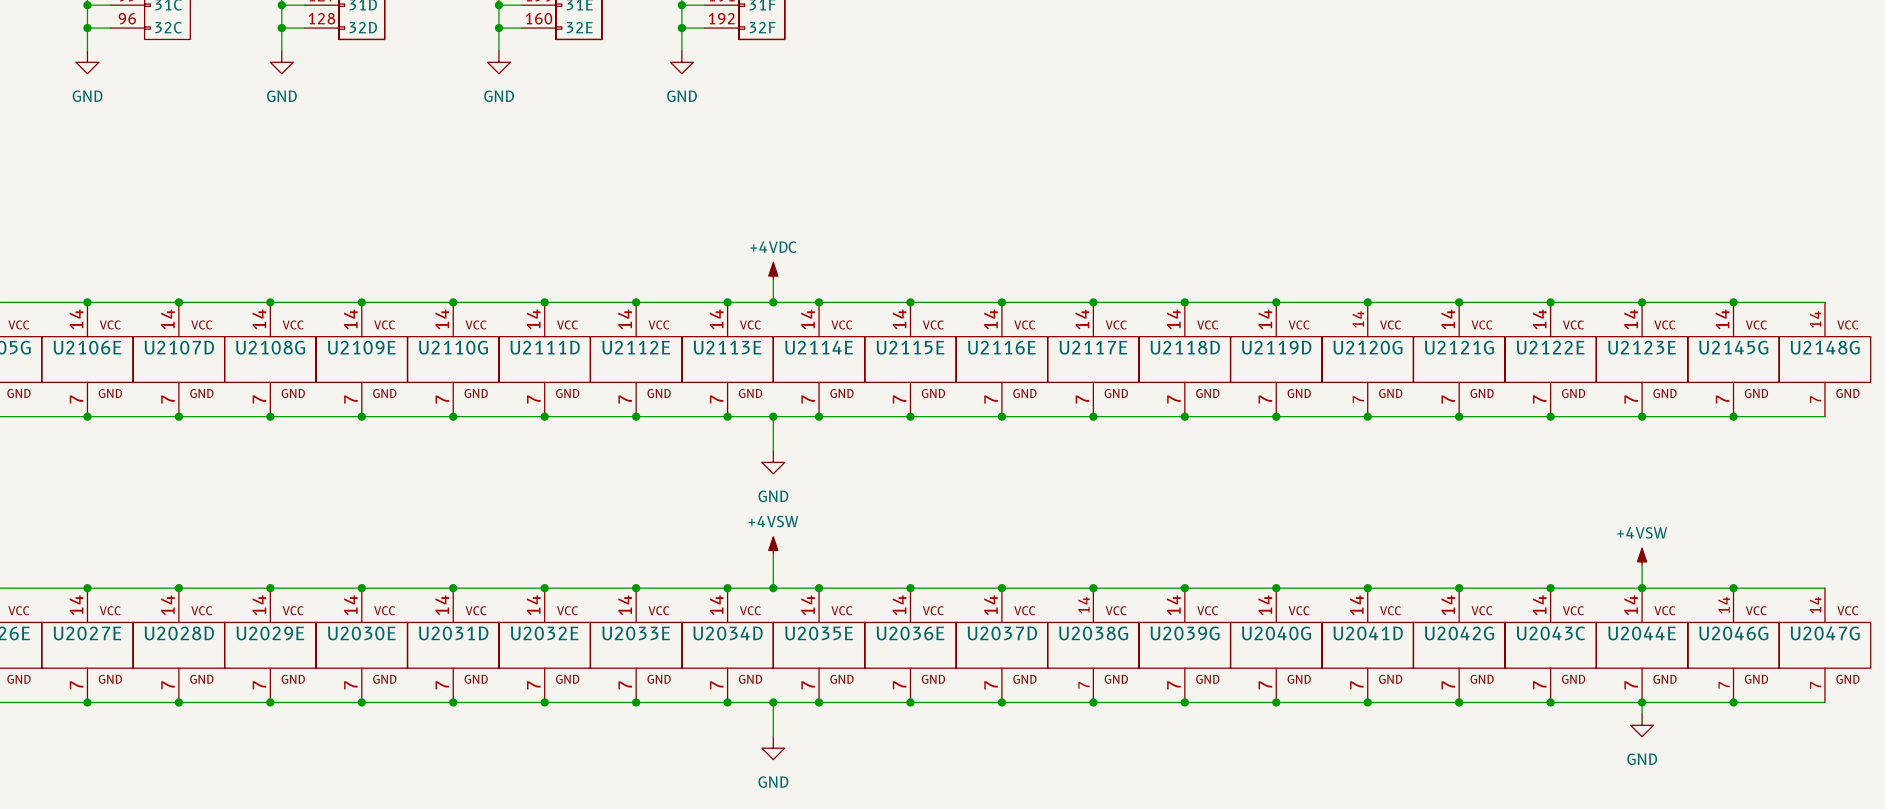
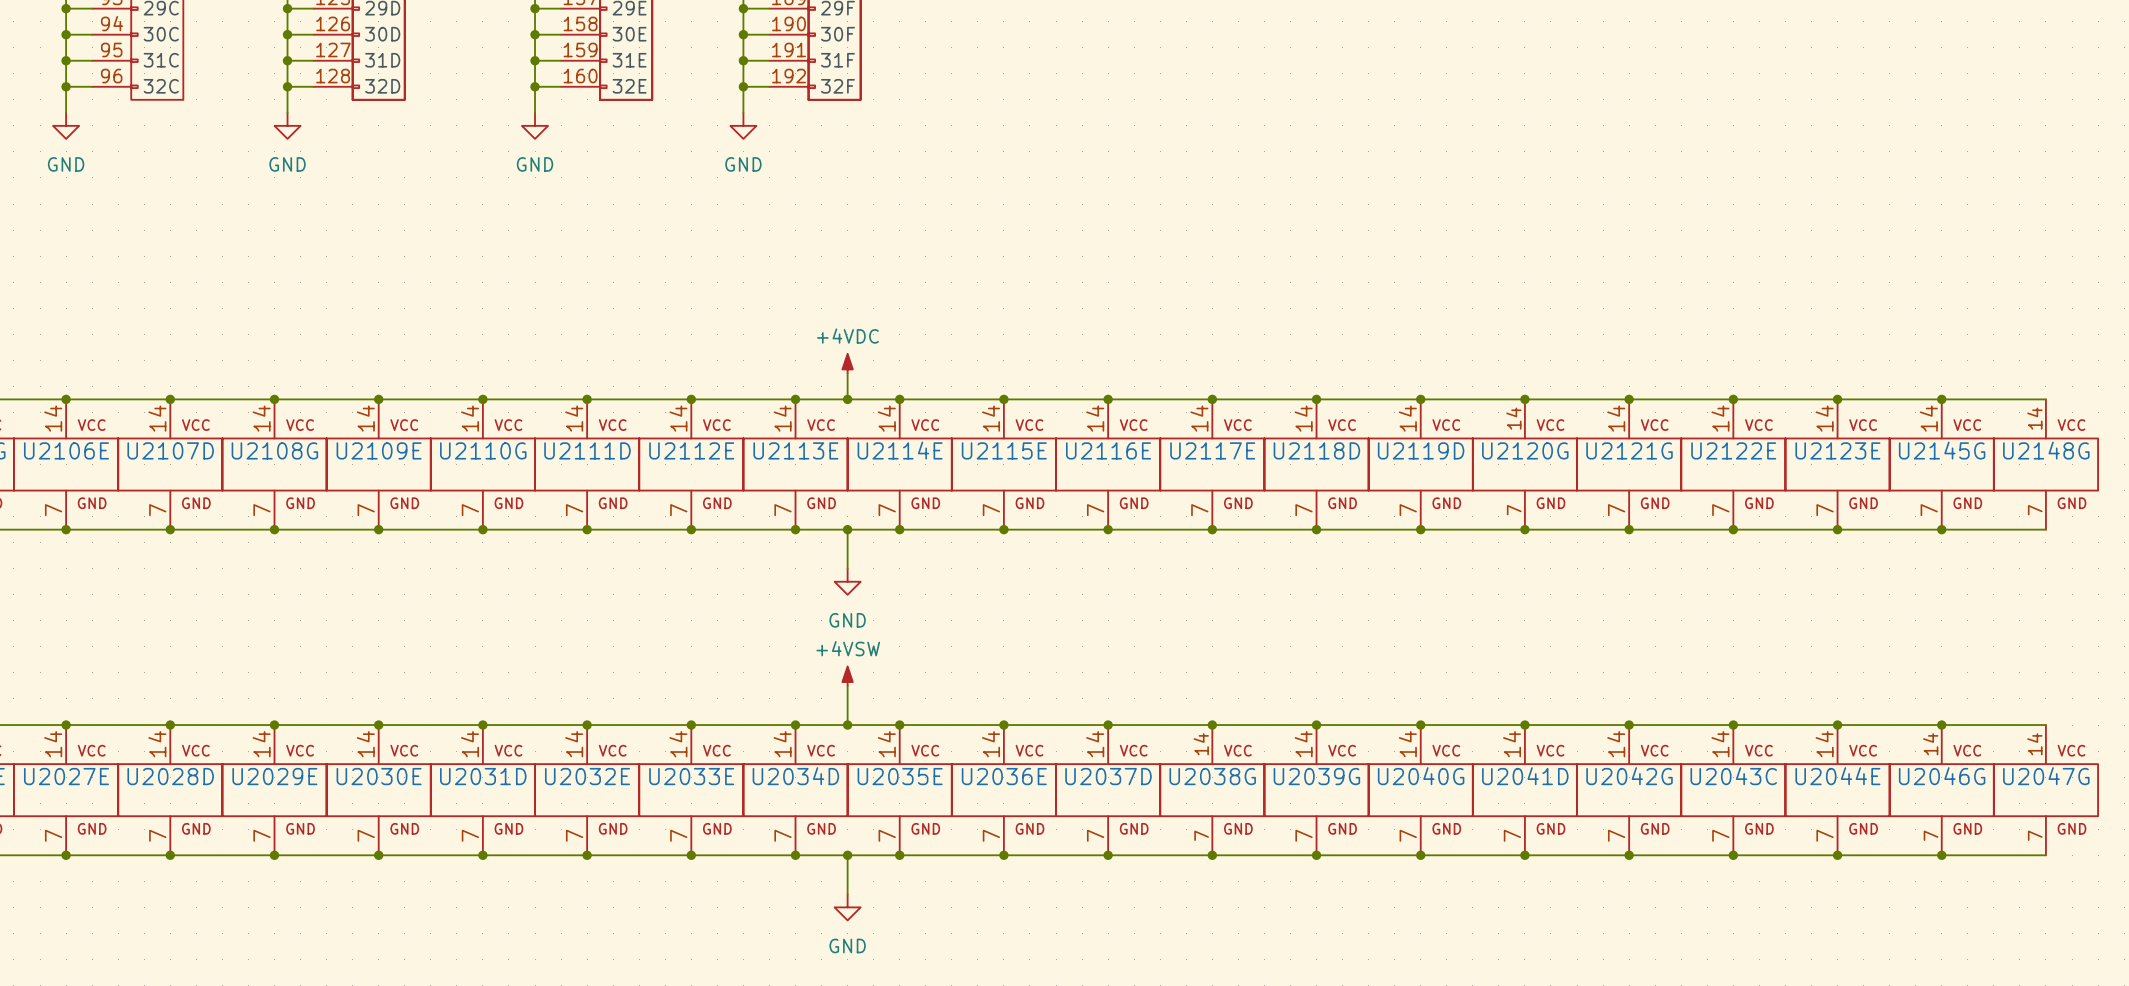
power symbol: +4VSW (1642, 556) -> none
wire: (1642, 565) (1642, 588) -> none
wire: (1642, 702) (1642, 713) -> none
power symbol: GND (1642, 725) -> none

